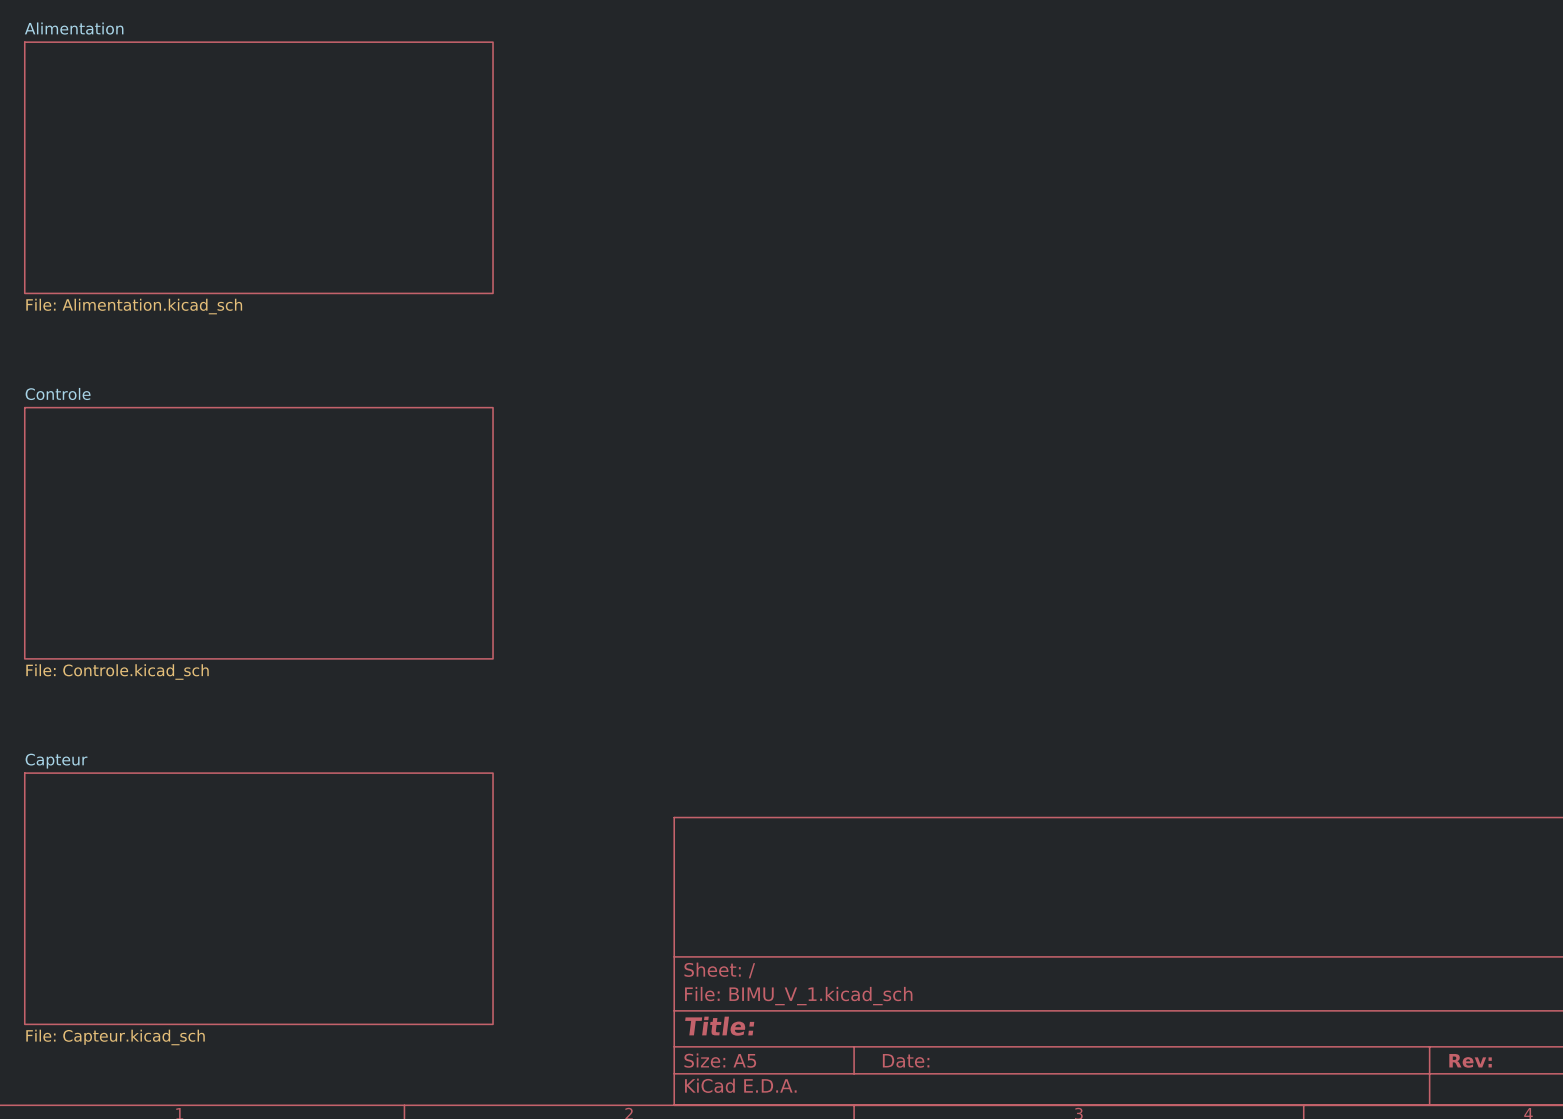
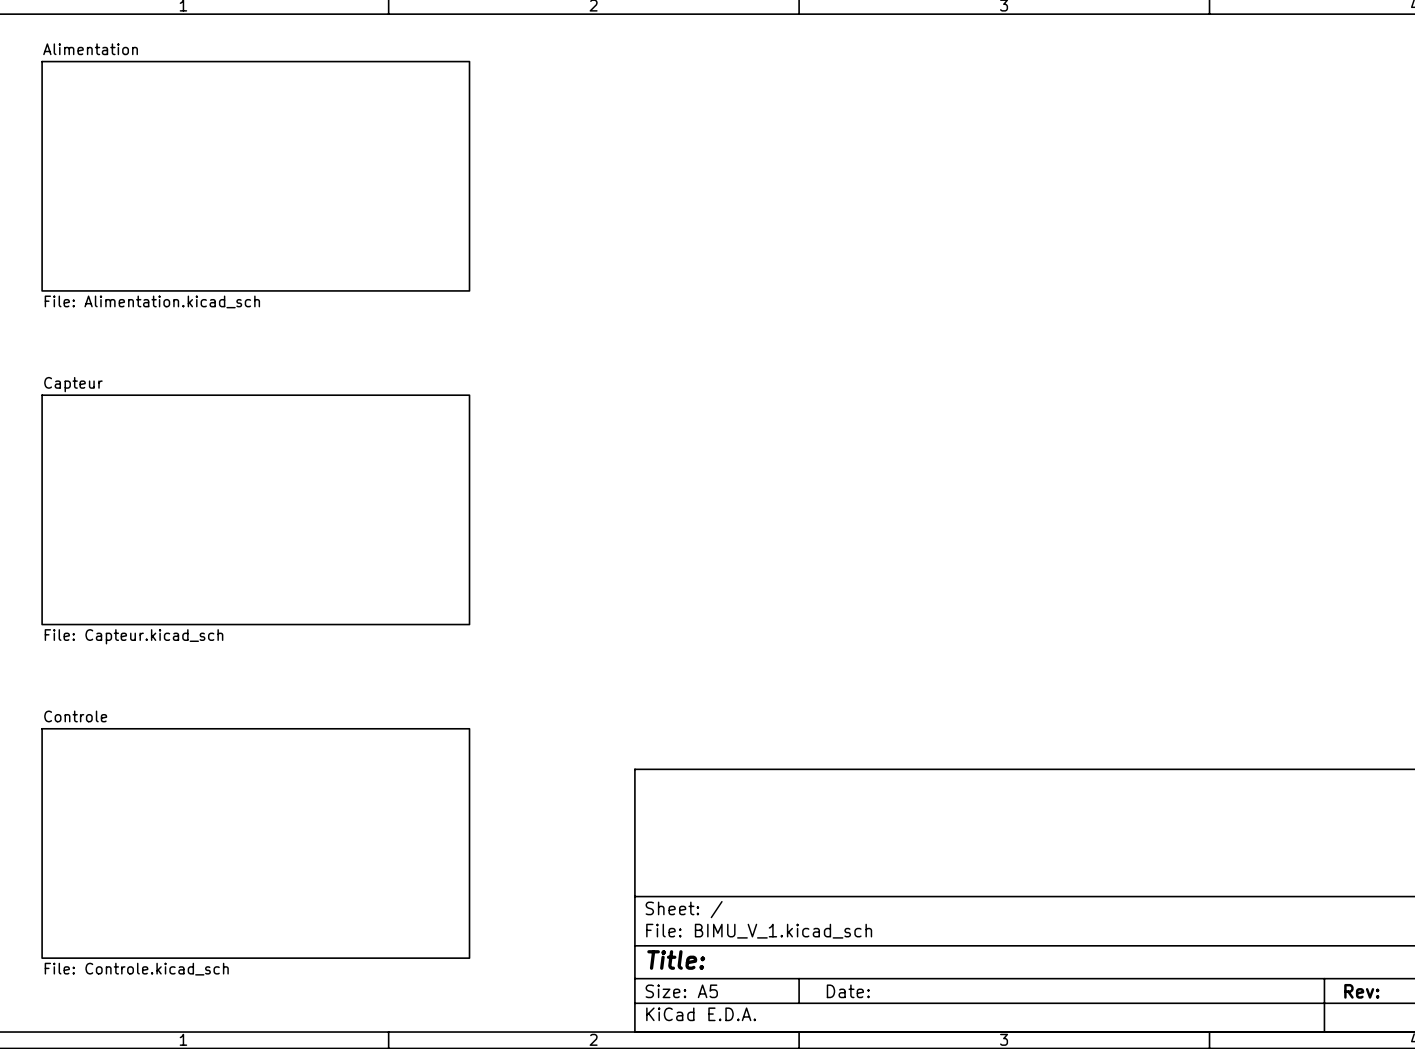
sheet Controle name: Controle (58, 393) -> Capteur (73, 384)
sheet Controle value: File: Controle.kicad_sch (117, 672) -> File: Capteur.kicad_sch (134, 636)
sheet Capteur name: Capteur (56, 761) -> Controle (75, 716)
sheet Capteur value: File: Capteur.kicad_sch (115, 1037) -> File: Controle.kicad_sch (136, 969)

